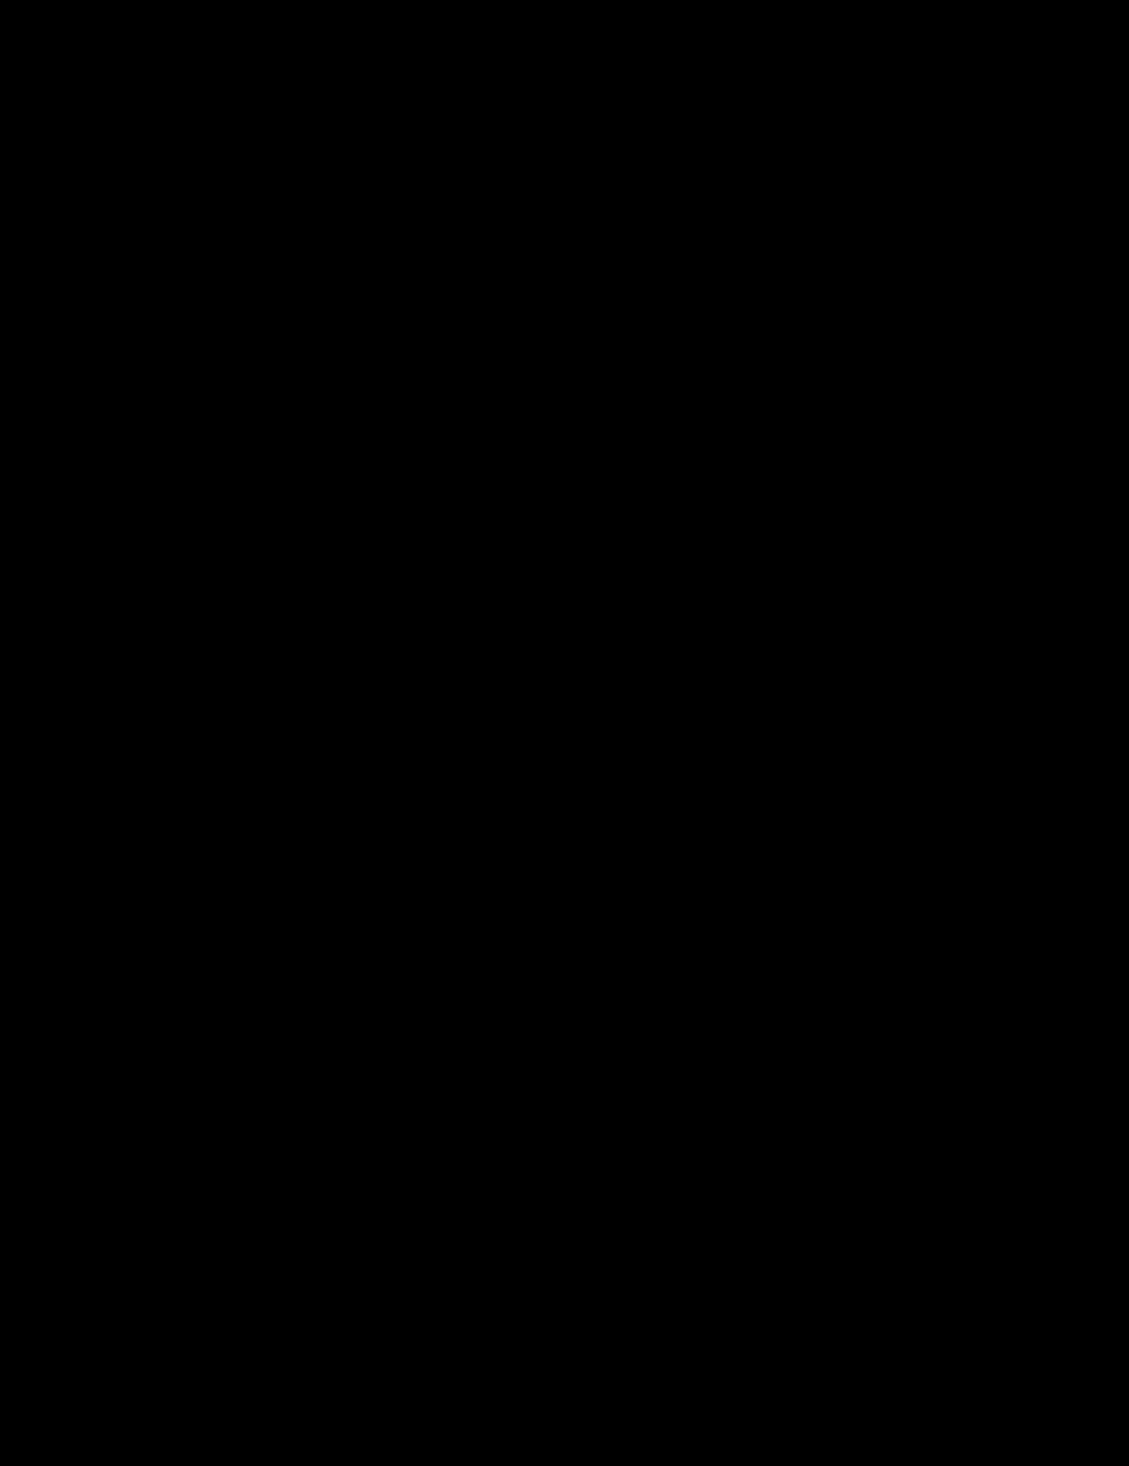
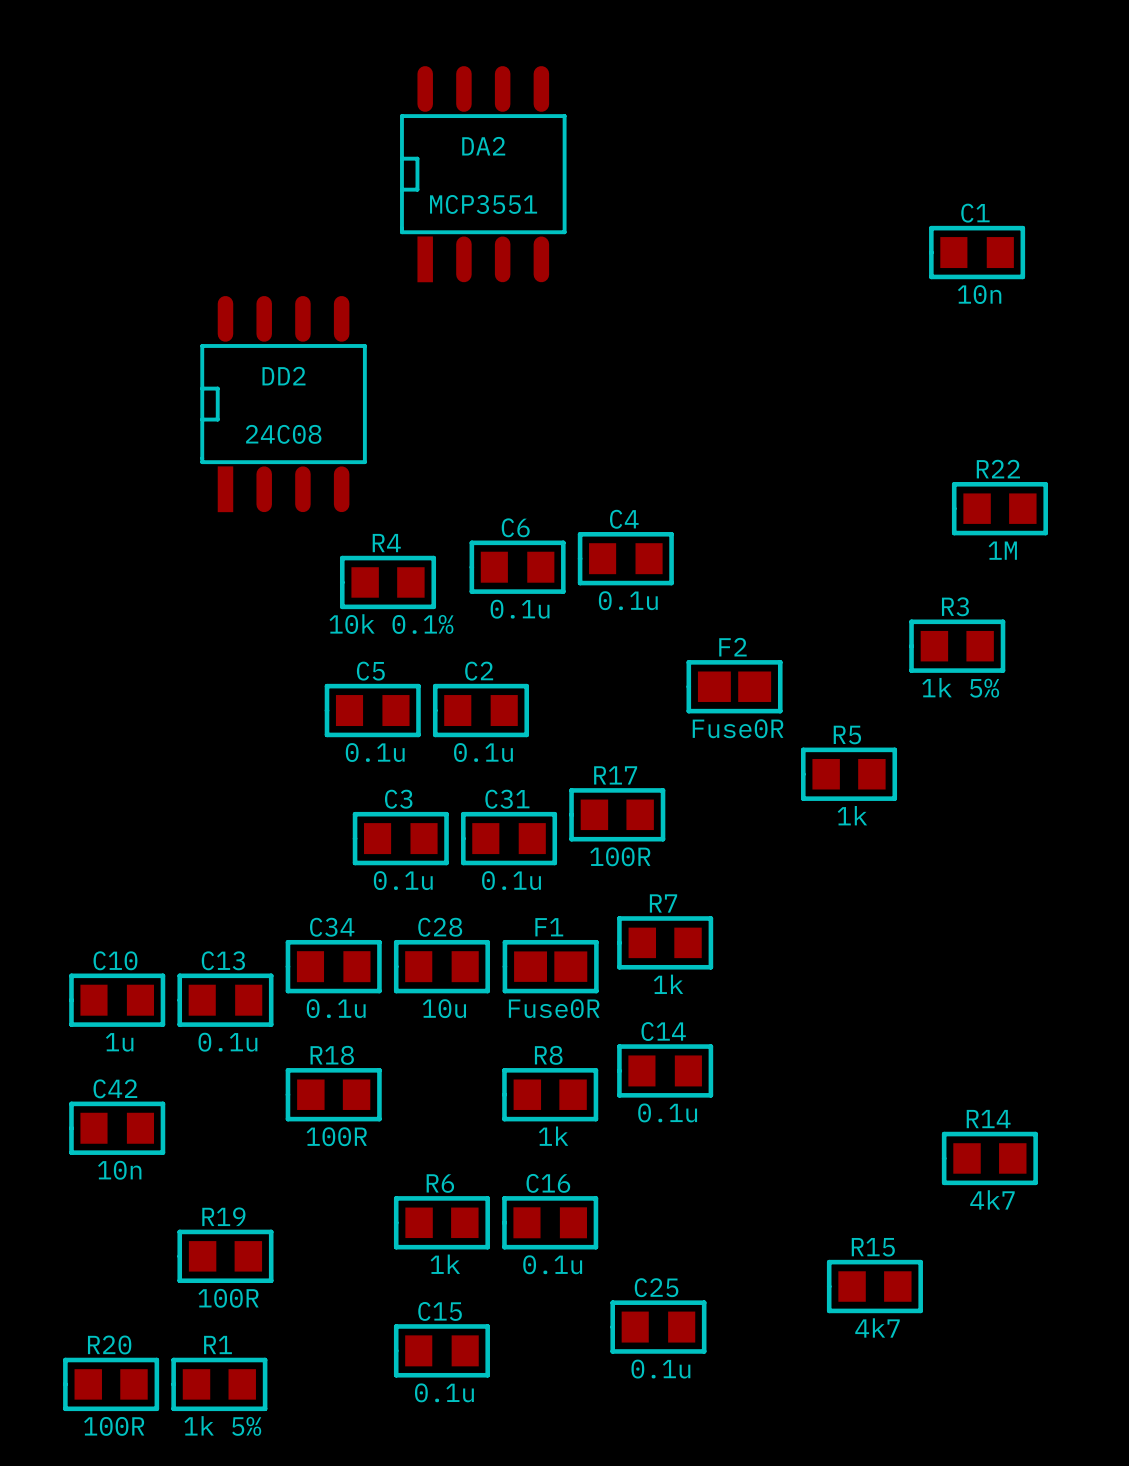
DA2: none -> MCP3551 (483, 174)
C1: none -> 10n (977, 252)
DD2: none -> 24C08 (283, 404)
R22: none -> 1M (999, 508)
C4: none -> 0.1u (625, 558)
C6: none -> 0.1u (517, 567)
R4: none -> 10k 0.1% (388, 582)
R3: none -> 1k 5% (957, 646)
F2: none -> Fuse0R (734, 686)
C5: none -> 0.1u (372, 710)
C2: none -> 0.1u (480, 710)
R5: none -> 1k (849, 774)
R17: none -> 100R (617, 814)
C3: none -> 0.1u (400, 838)
C31: none -> 0.1u (509, 838)
R7: none -> 1k (665, 942)
C34: none -> 0.1u (333, 966)
C28: none -> 10u (441, 966)
F1: none -> Fuse0R (550, 966)
C10: none -> 1u (117, 1000)
C13: none -> 0.1u (225, 1000)
C14: none -> 0.1u (665, 1070)
R18: none -> 100R (333, 1094)
R8: none -> 1k (550, 1094)
C42: none -> 10n (117, 1128)
R14: none -> 4k7 (989, 1158)
R6: none -> 1k (441, 1222)
C16: none -> 0.1u (550, 1222)
R19: none -> 100R (225, 1256)
R15: none -> 4k7 (874, 1286)
C25: none -> 0.1u (658, 1327)
C15: none -> 0.1u (441, 1350)
R20: none -> 100R (111, 1384)
R1: none -> 1k 5% (219, 1384)

